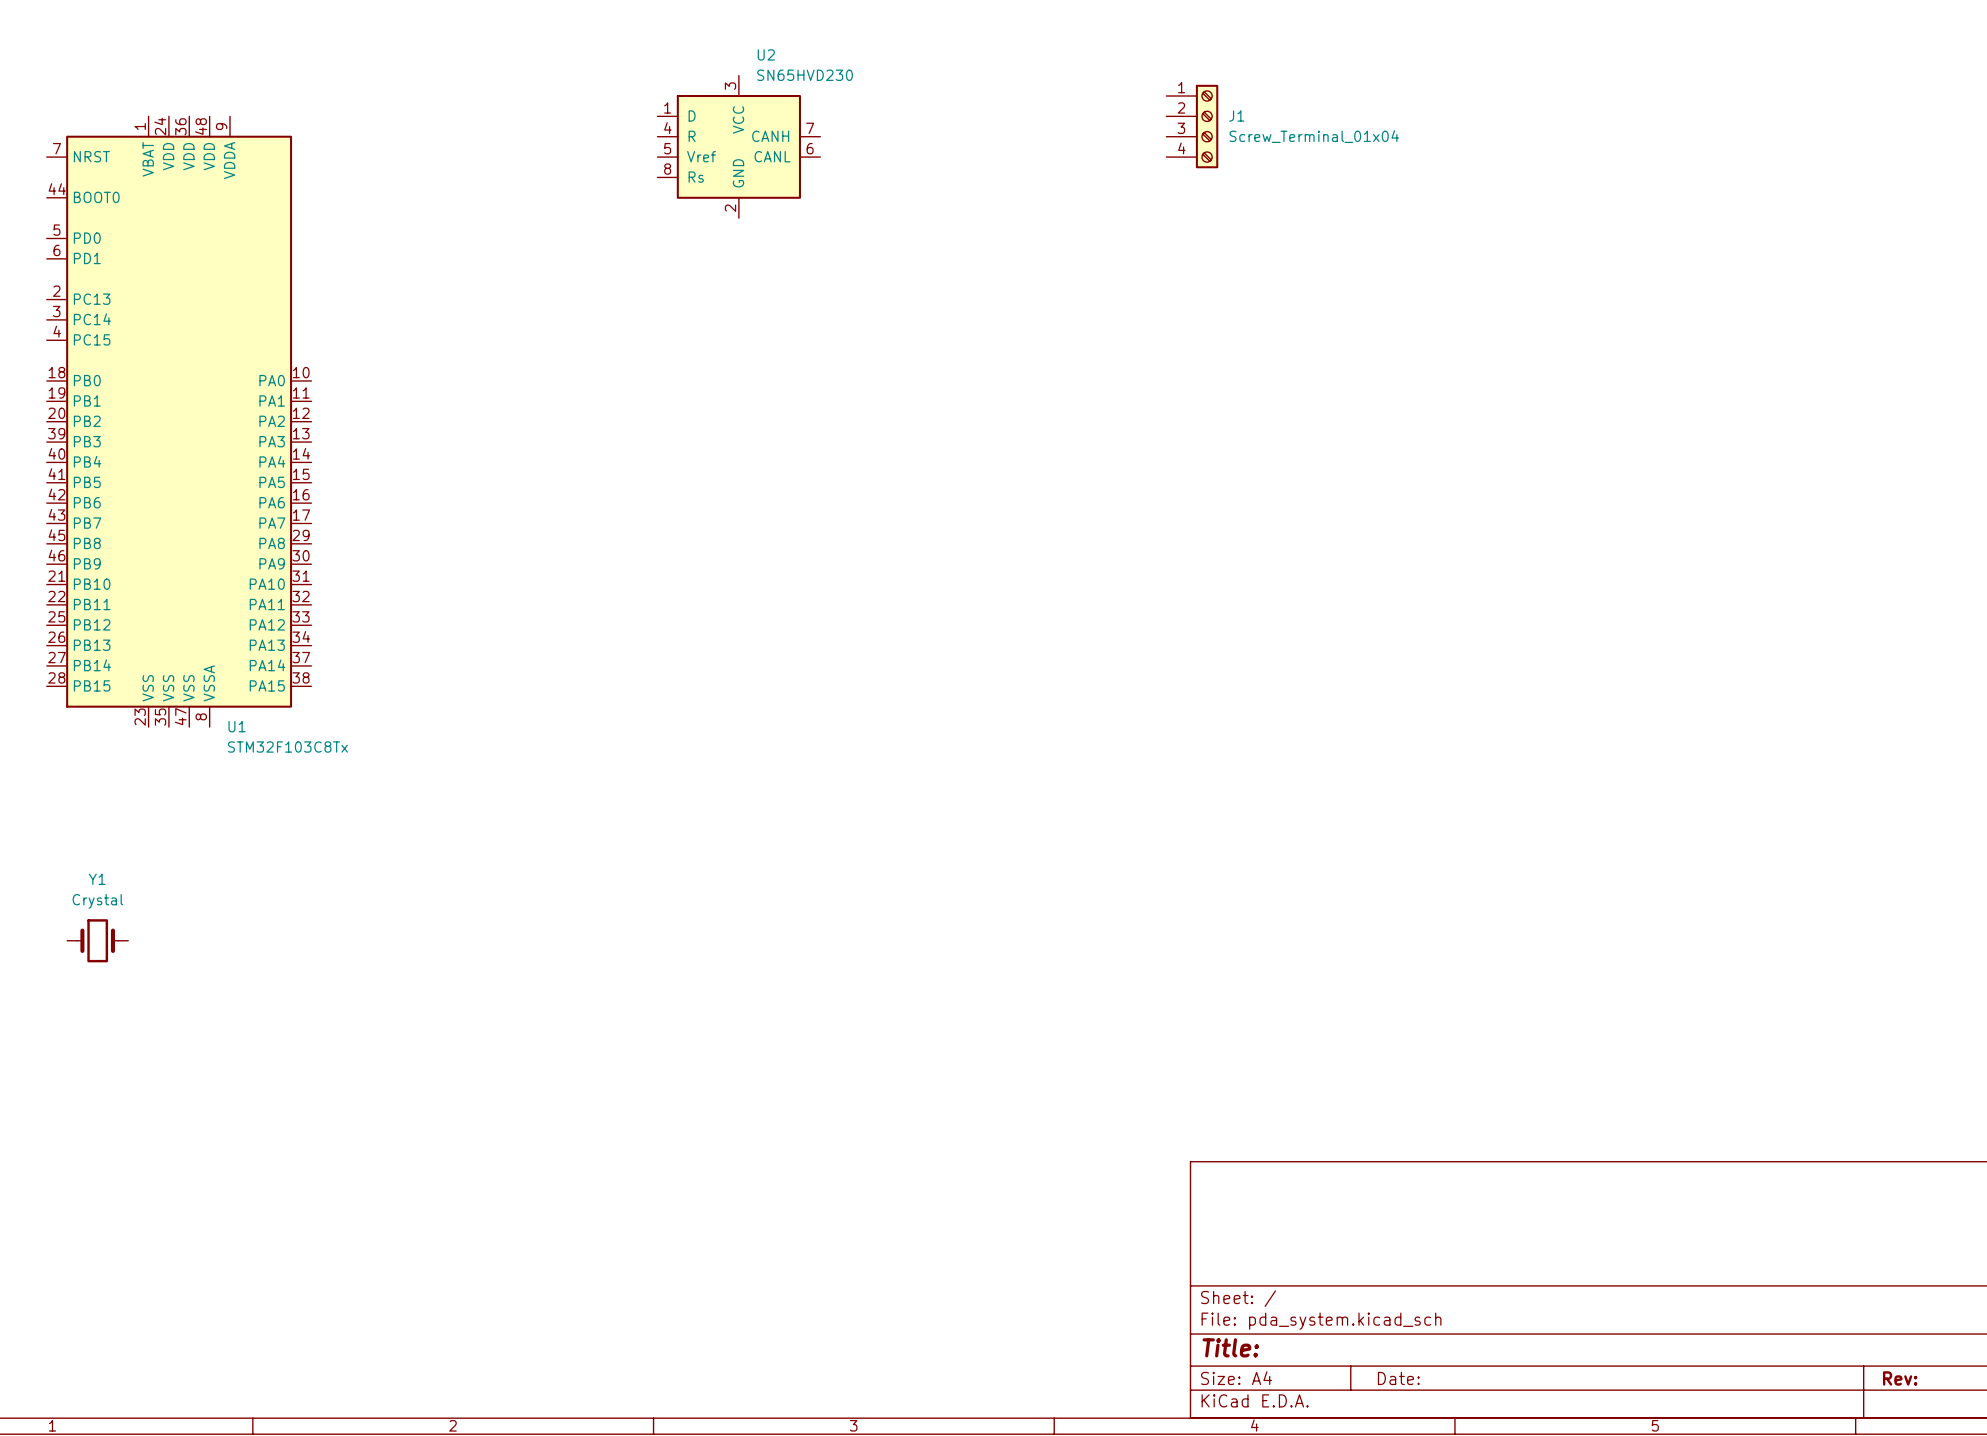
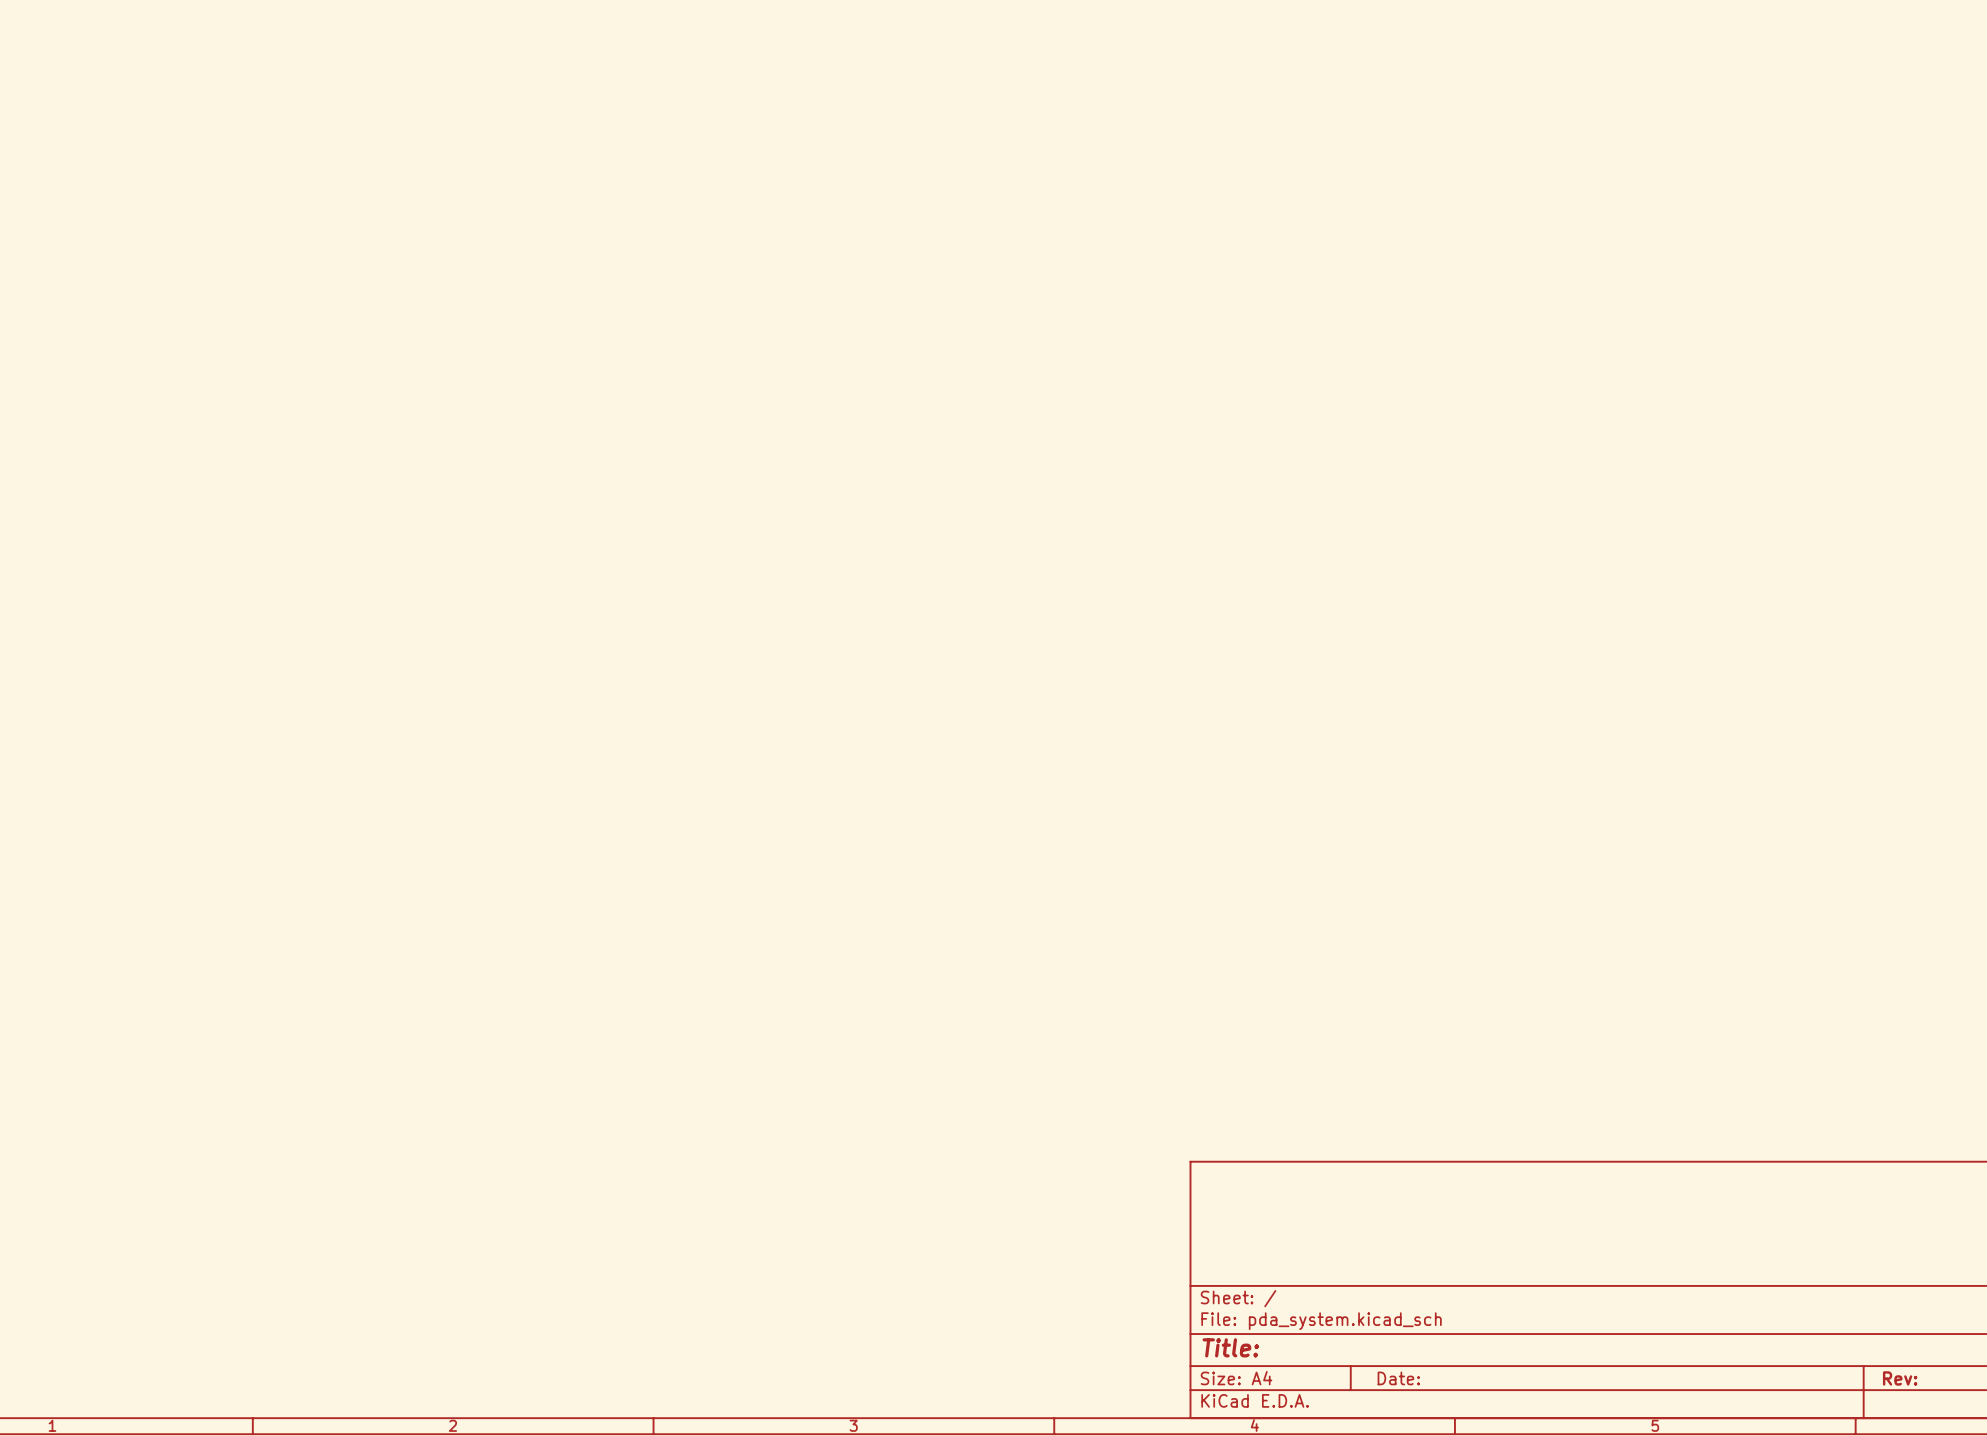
J1: Screw_Terminal_01x04 (1192, 126) -> none
U2: SN65HVD230 (738, 146) -> none
U1: STM32F103C8Tx (179, 421) -> none
Y1: Crystal (97, 940) -> none

